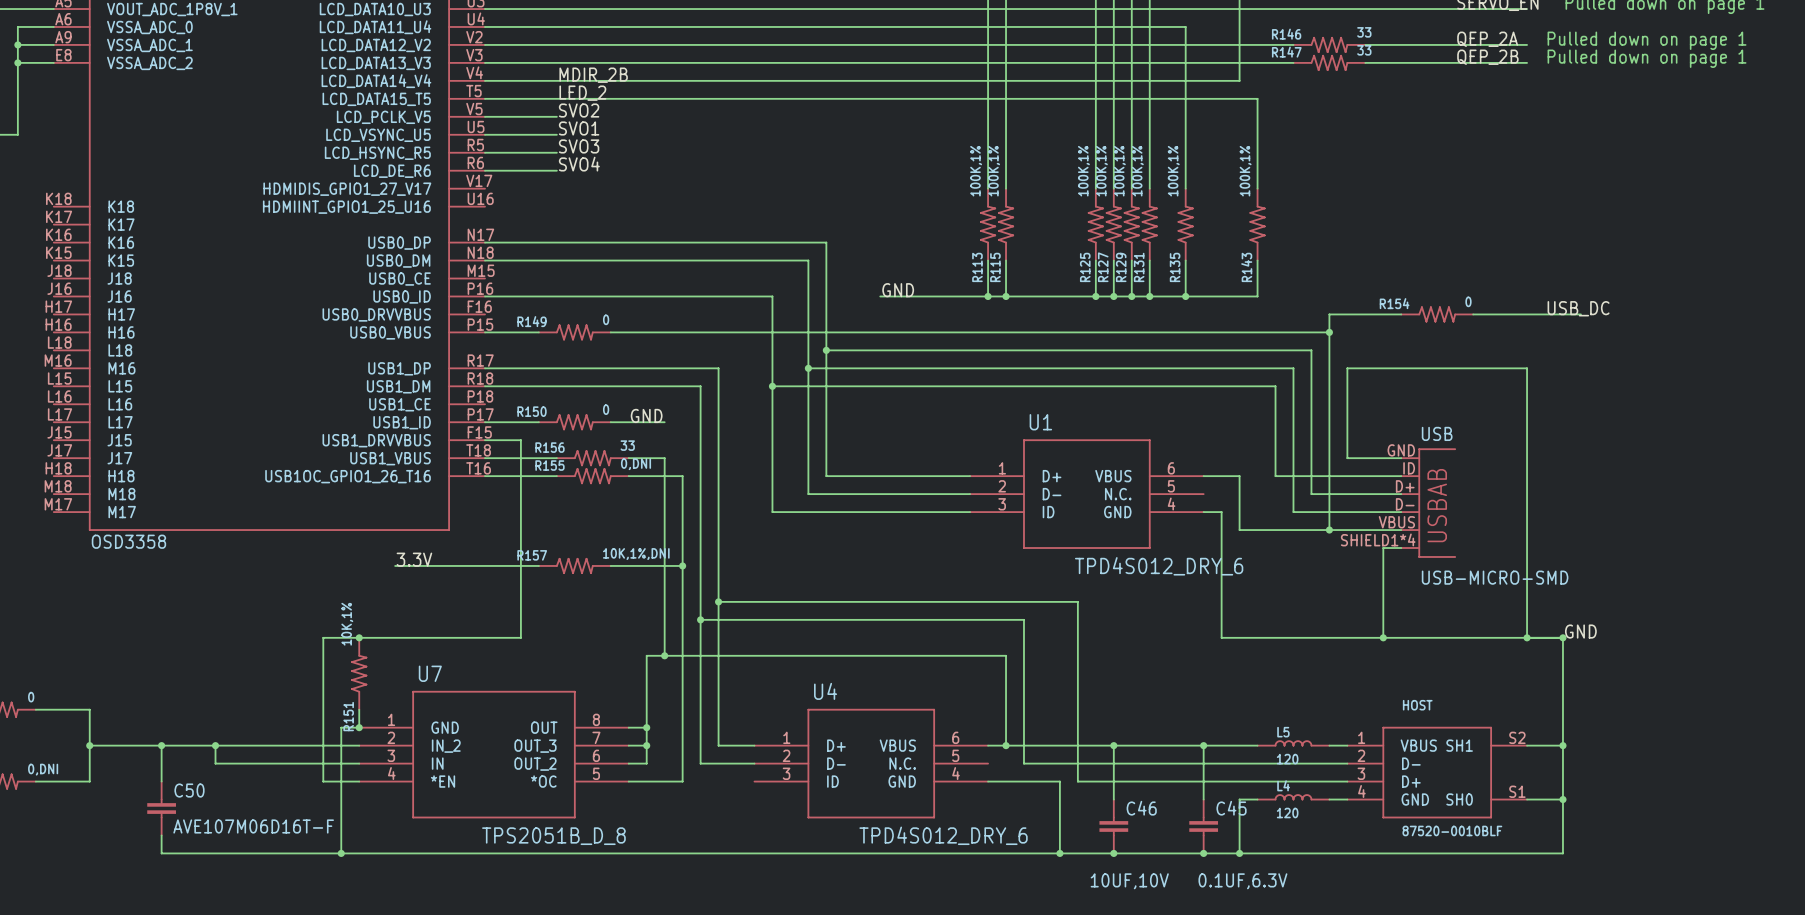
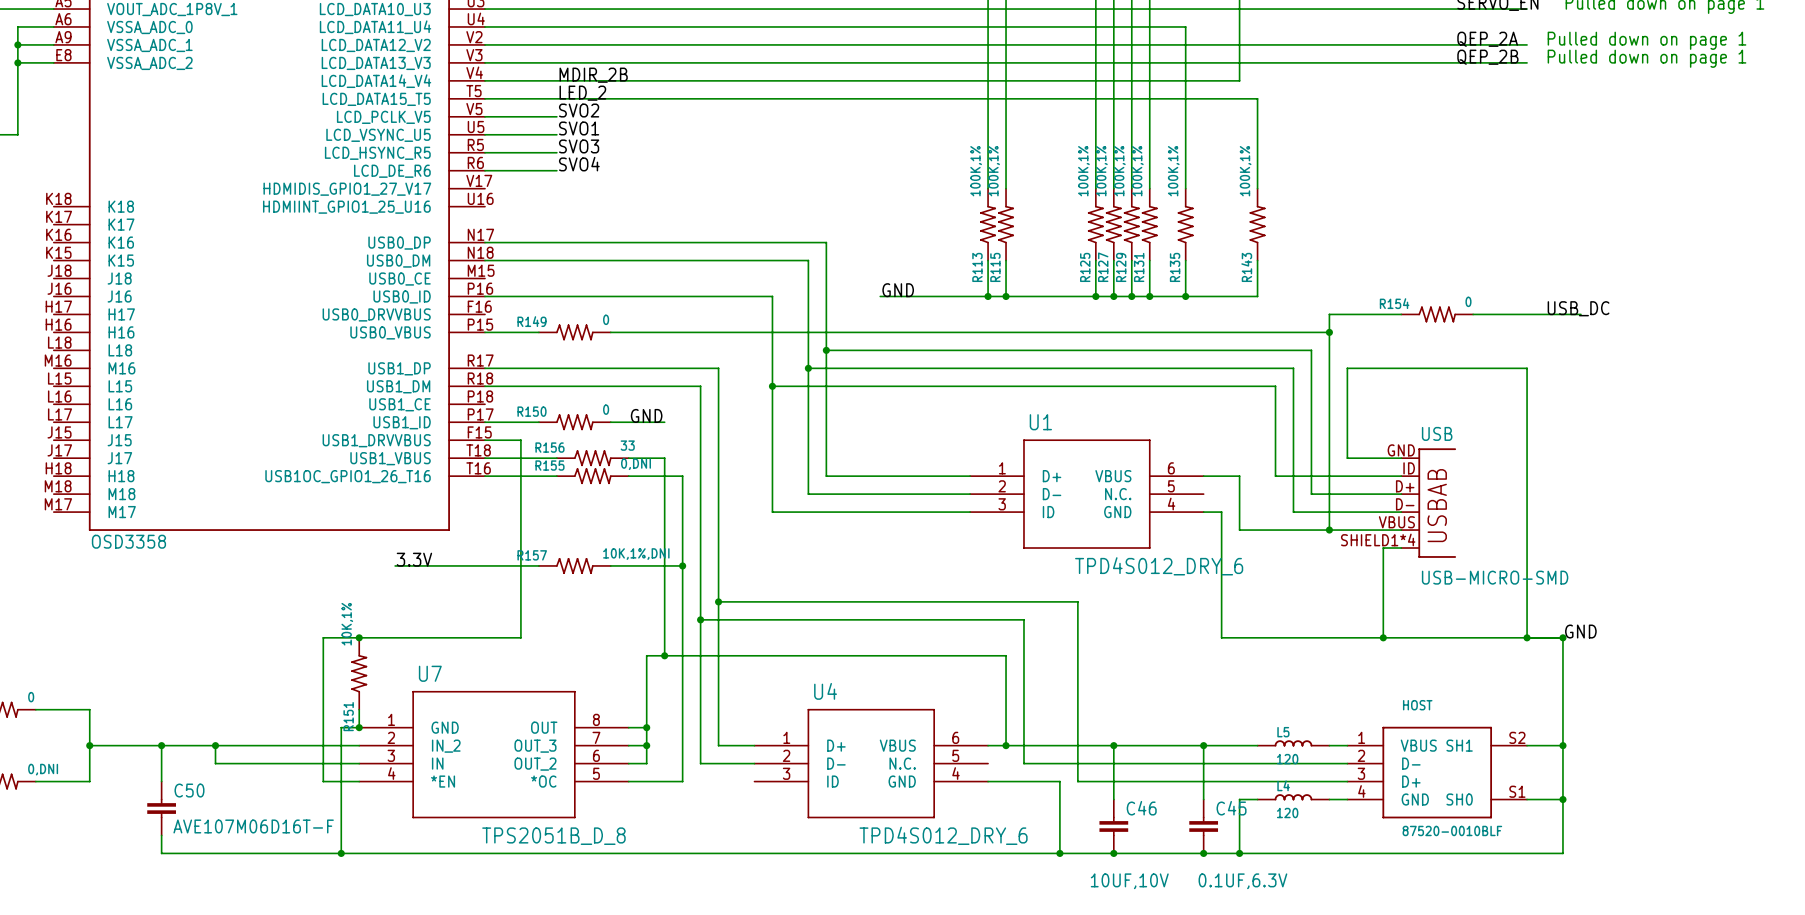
R146: 33 (1329, 44) -> none
R147: 33 (1329, 62) -> none

